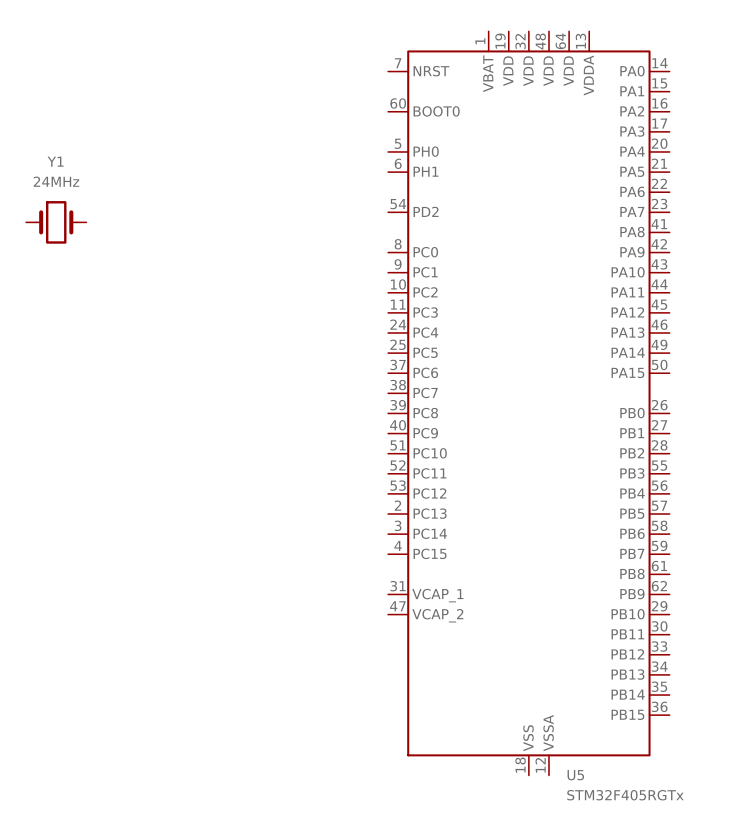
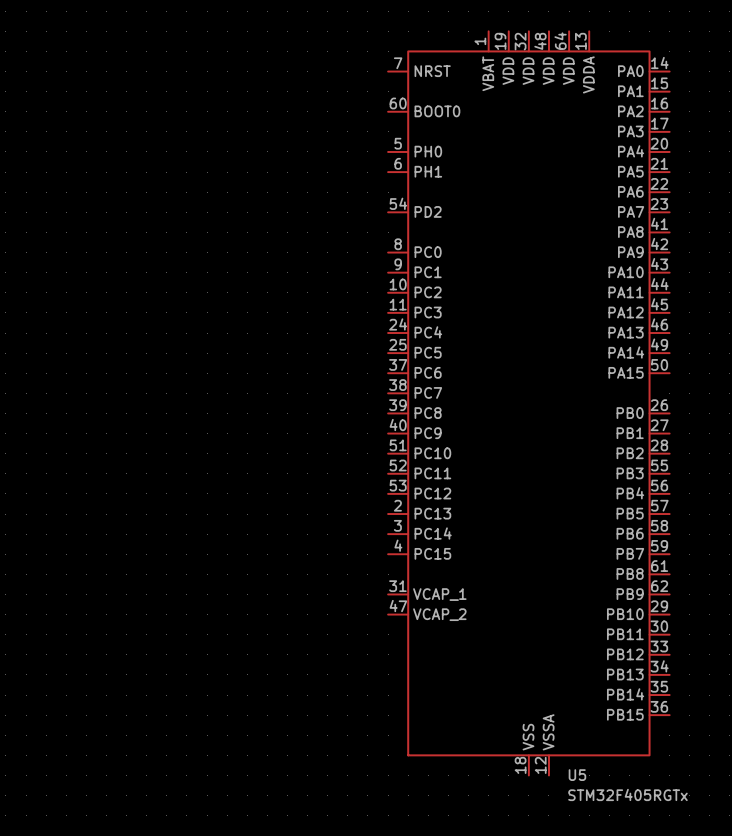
Y1: 24MHz (56, 222) -> none

